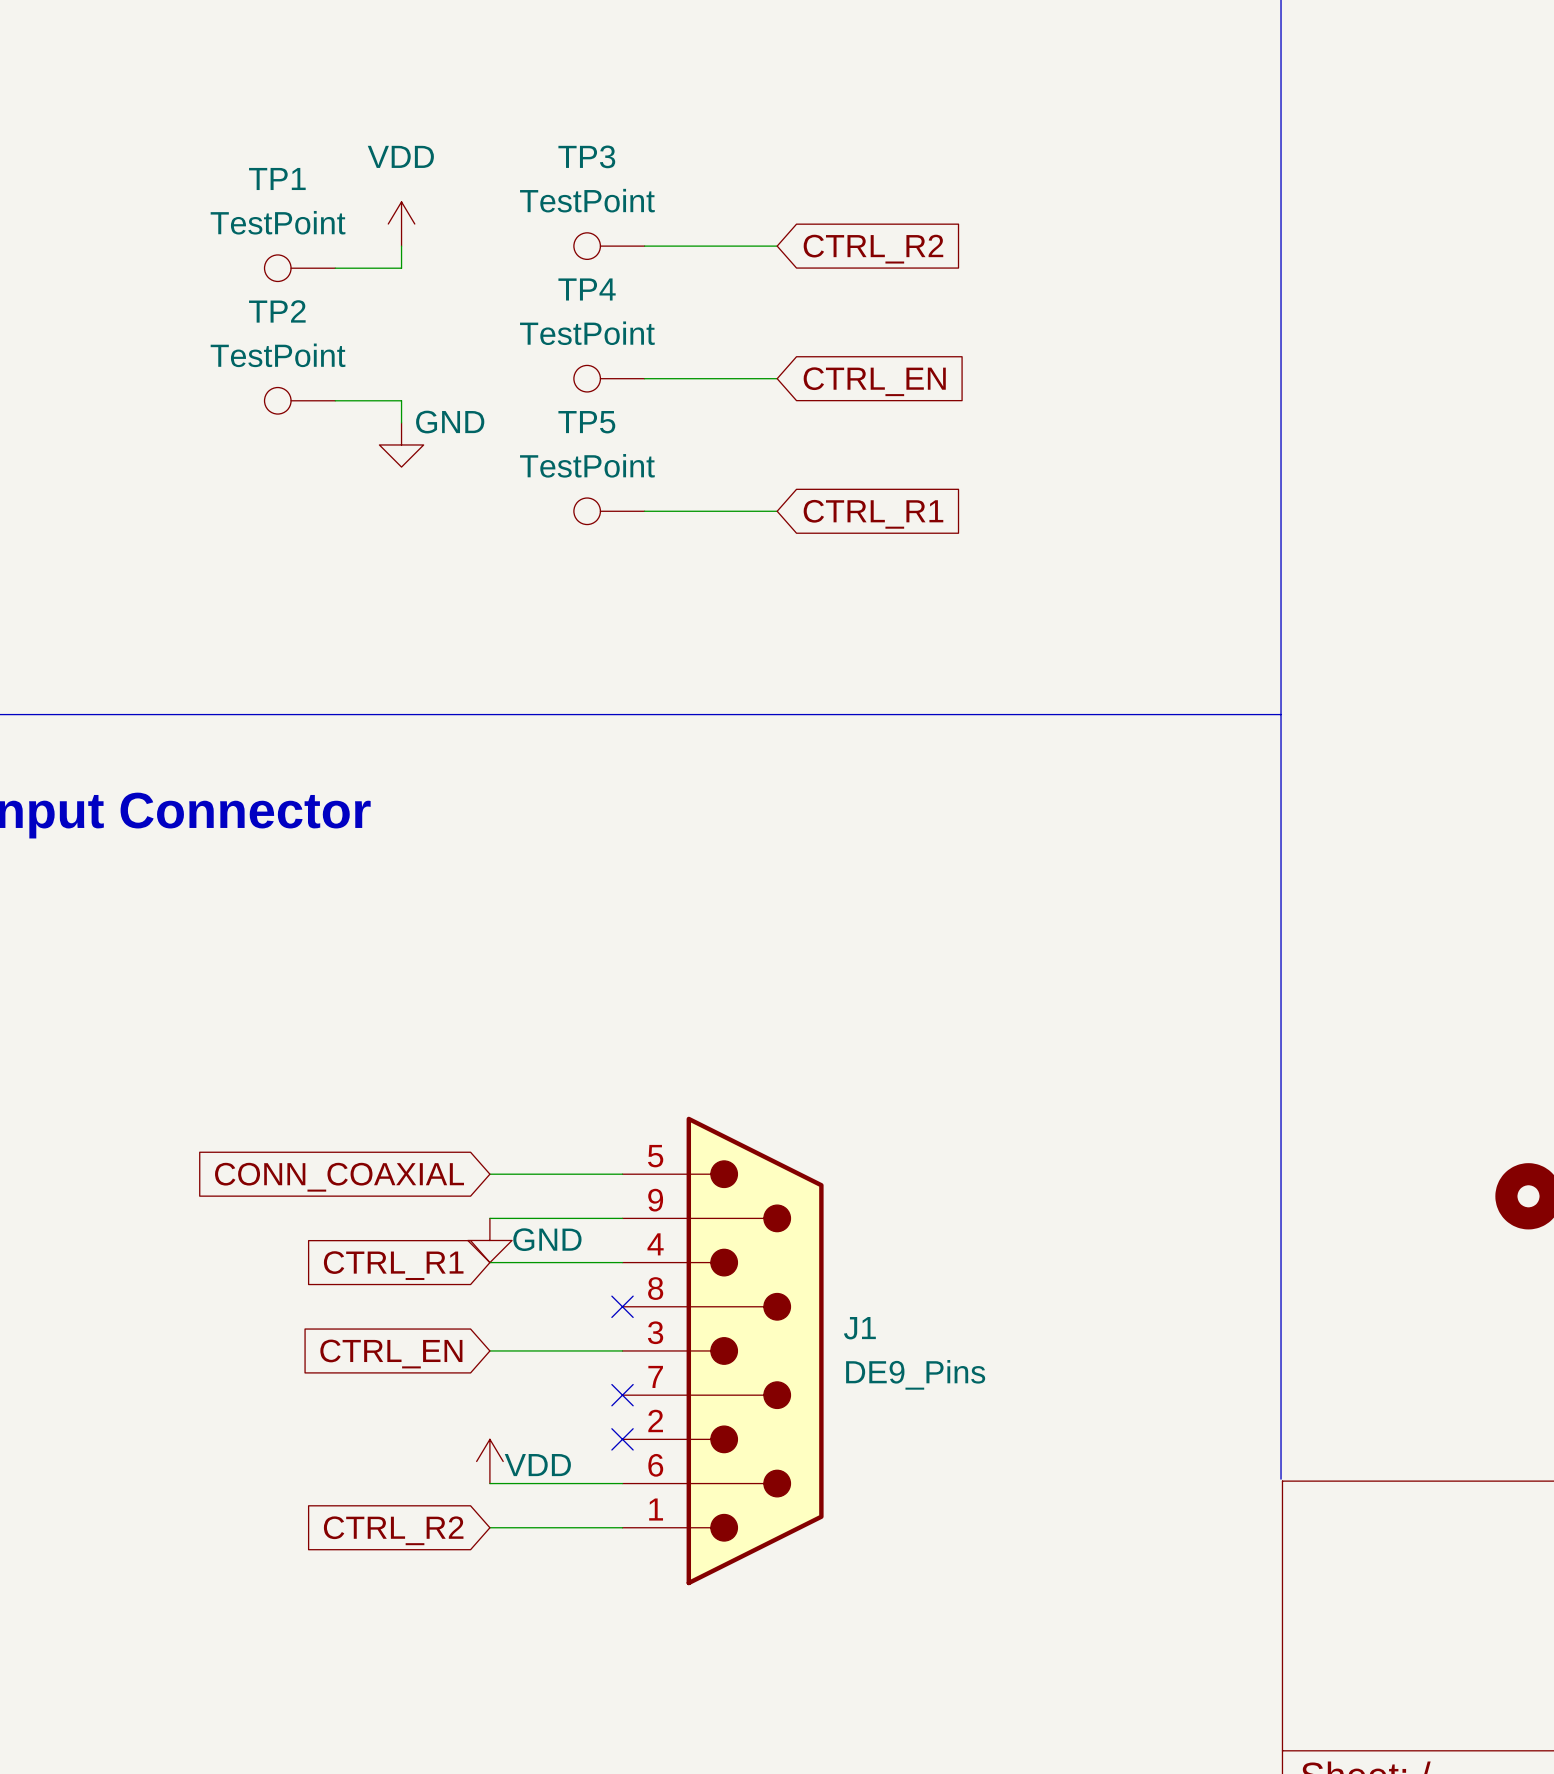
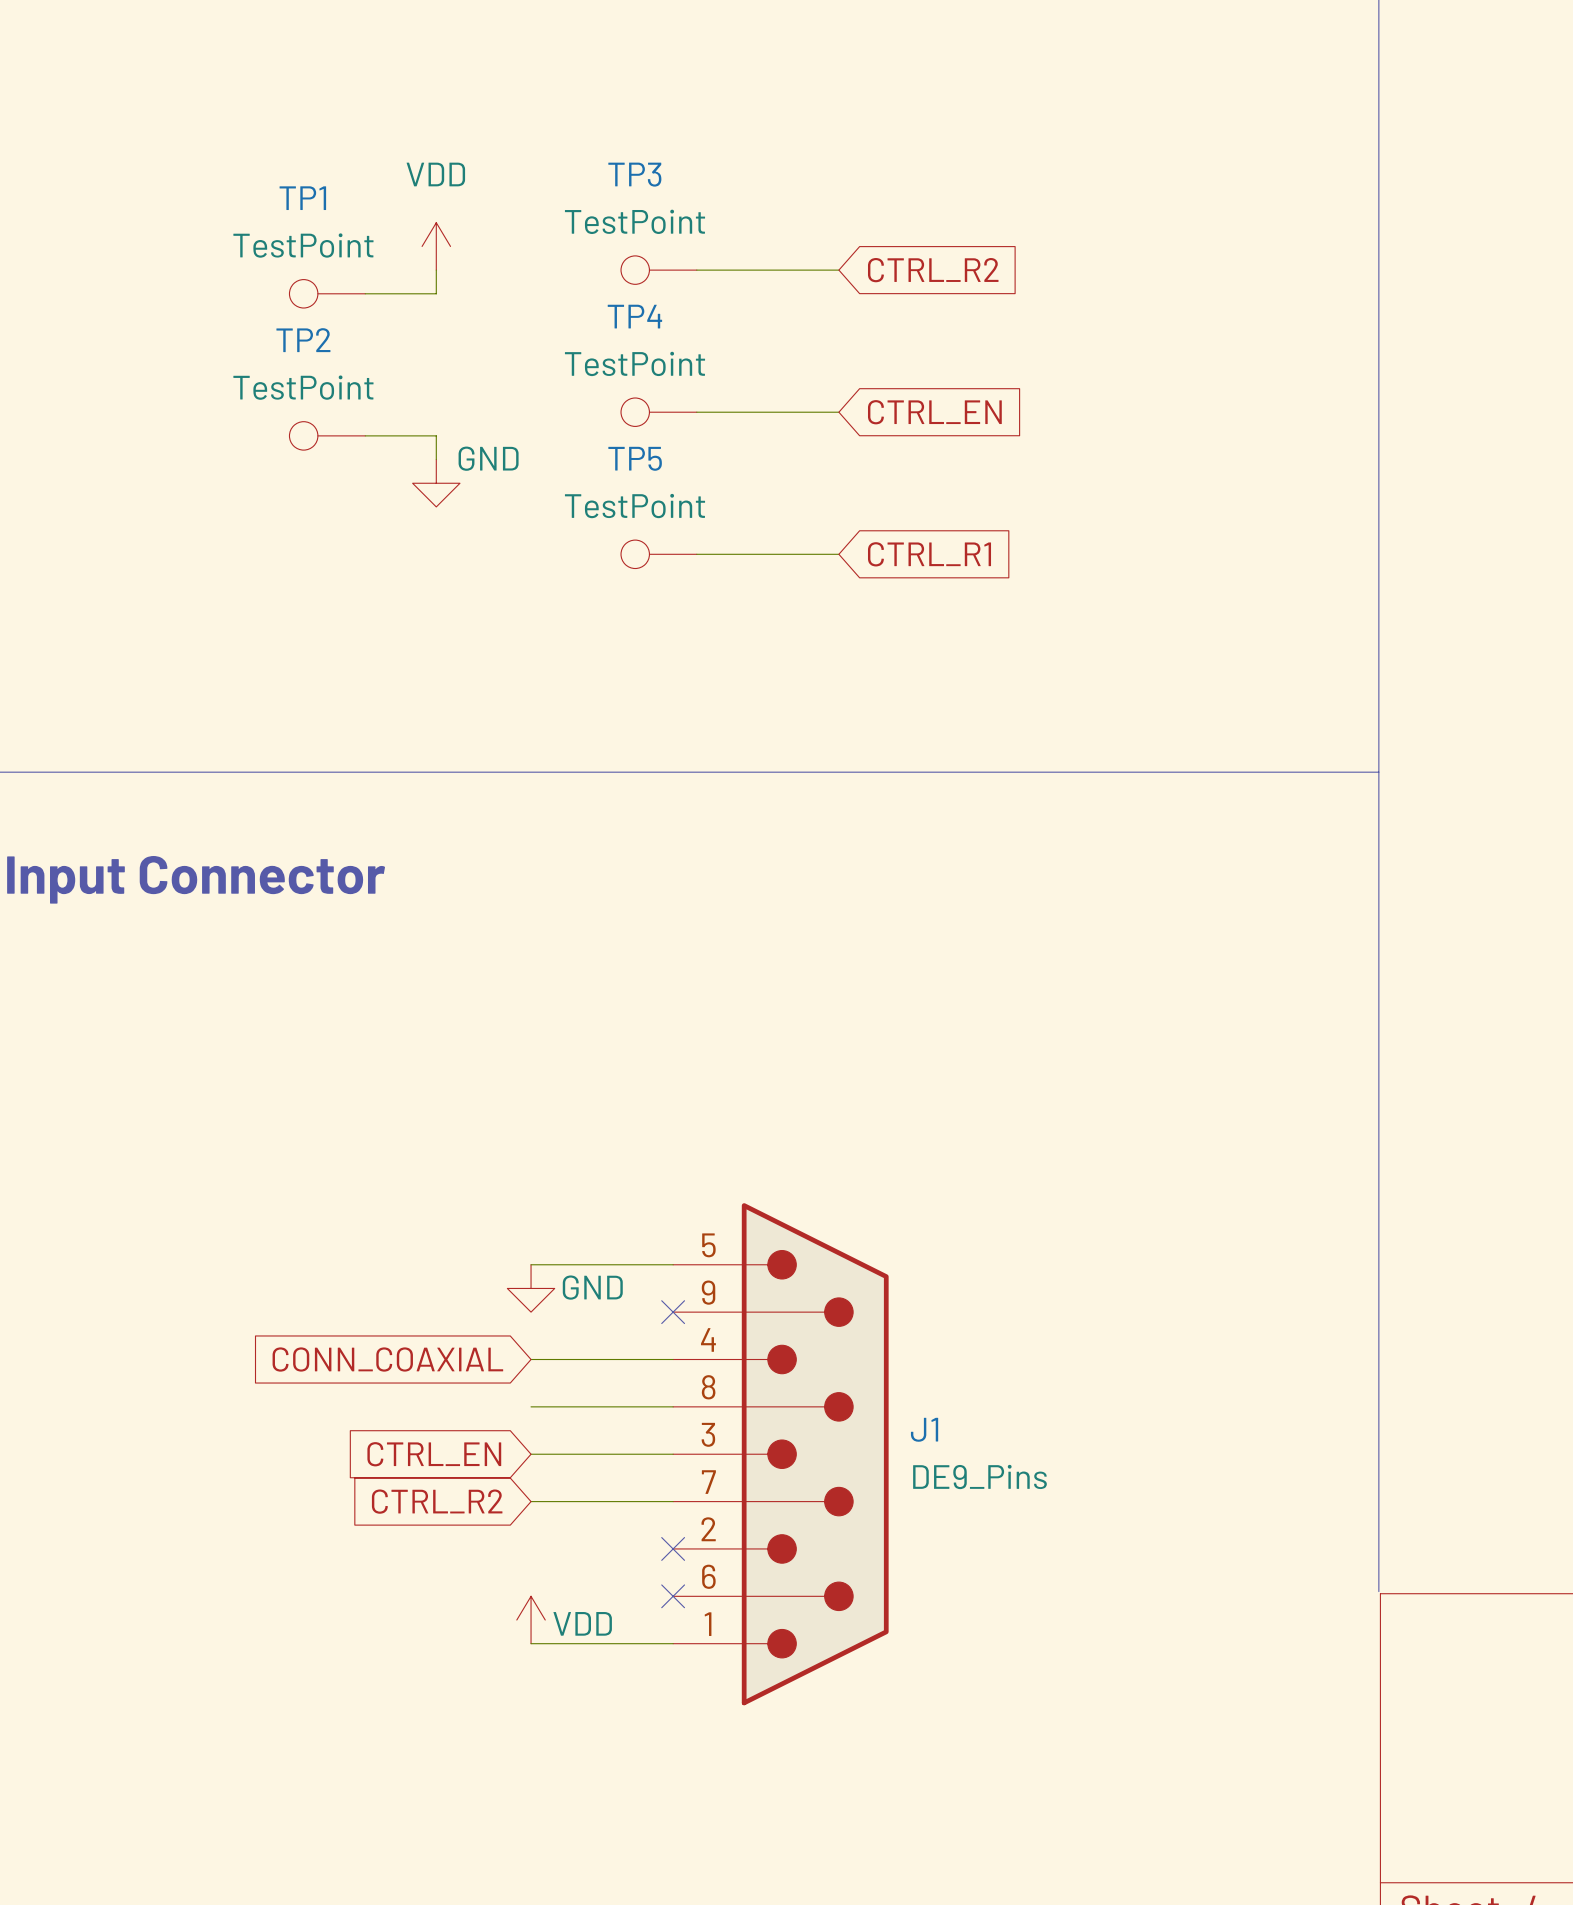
global label: CONN_COAXIAL (339, 1177) -> none
wire: (489, 1218) (622, 1218) -> (531, 1406) (673, 1406)
no-connect mark: none -> (673, 1312)
power symbol position: GND (489, 1240) -> GND (531, 1288)
global label: CTRL_R1 (393, 1265) -> CONN_COAXIAL (387, 1359)
no-connect mark: (622, 1306) -> none
no-connect mark: (622, 1395) -> none
power symbol position: VDD (489, 1461) -> VDD (531, 1620)
wire: (489, 1483) (622, 1483) -> (531, 1501) (673, 1501)
no-connect mark: none -> (673, 1596)
global label position: CTRL_R2 (393, 1530) -> CTRL_R2 (437, 1501)

